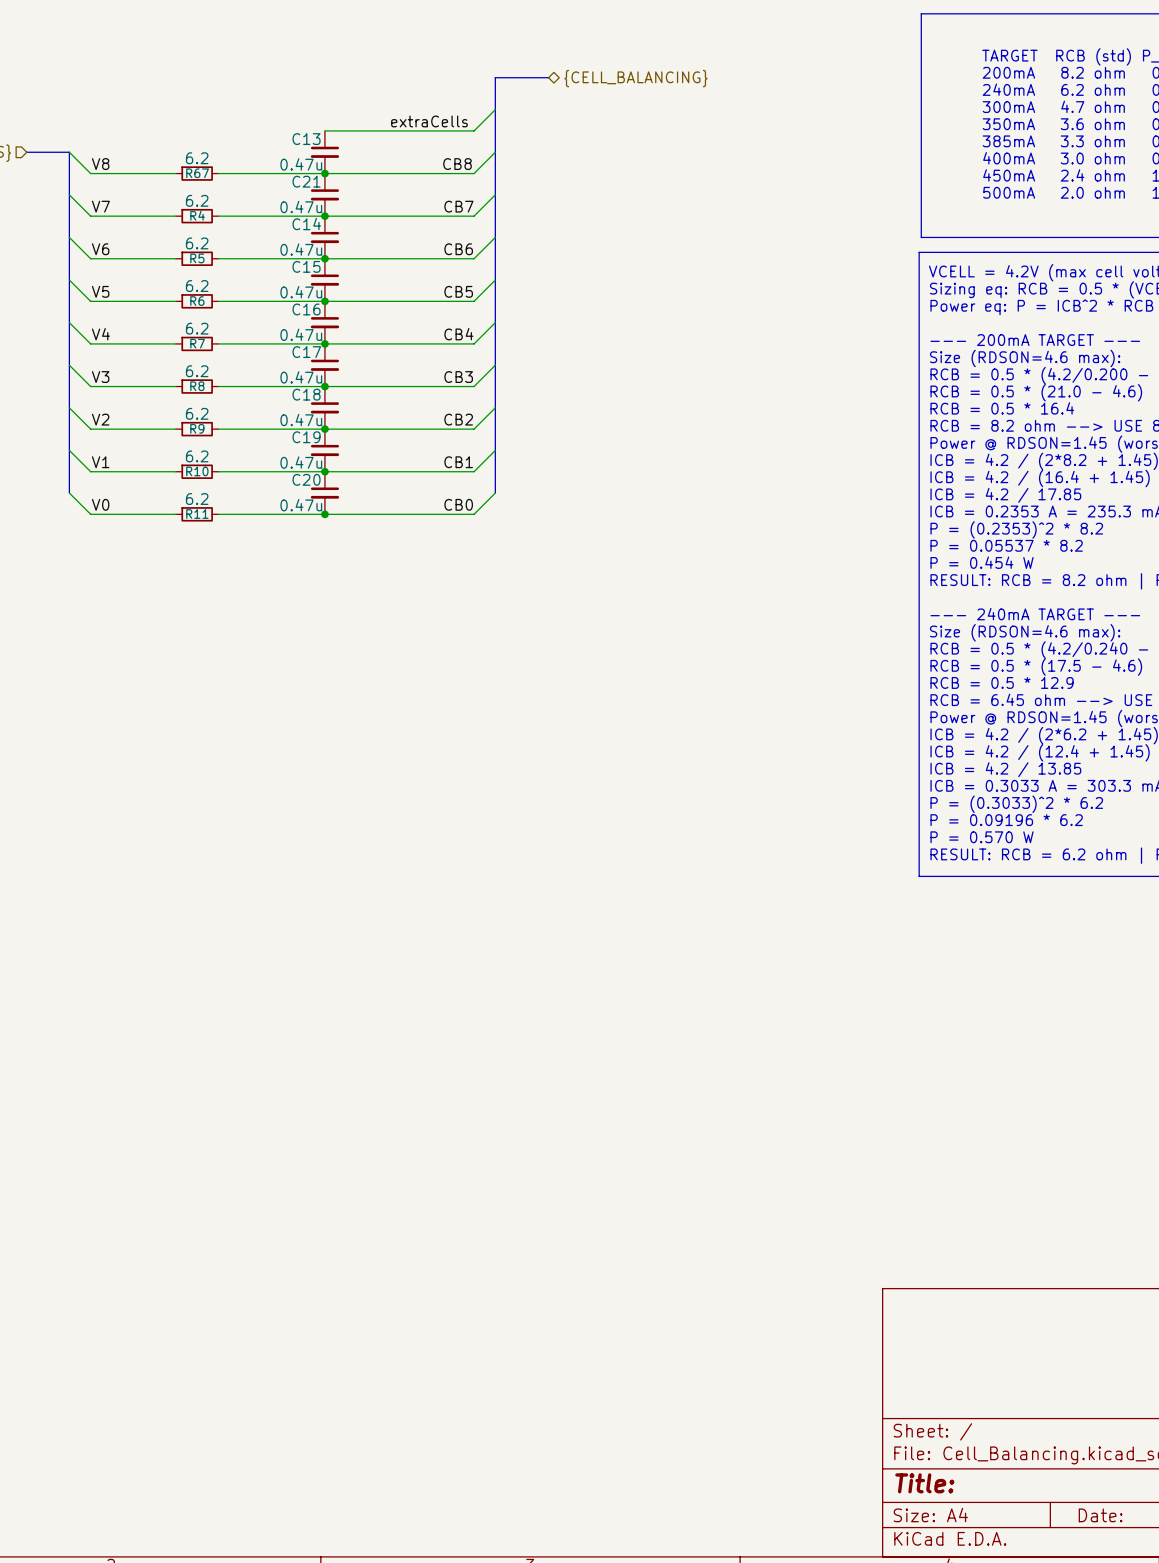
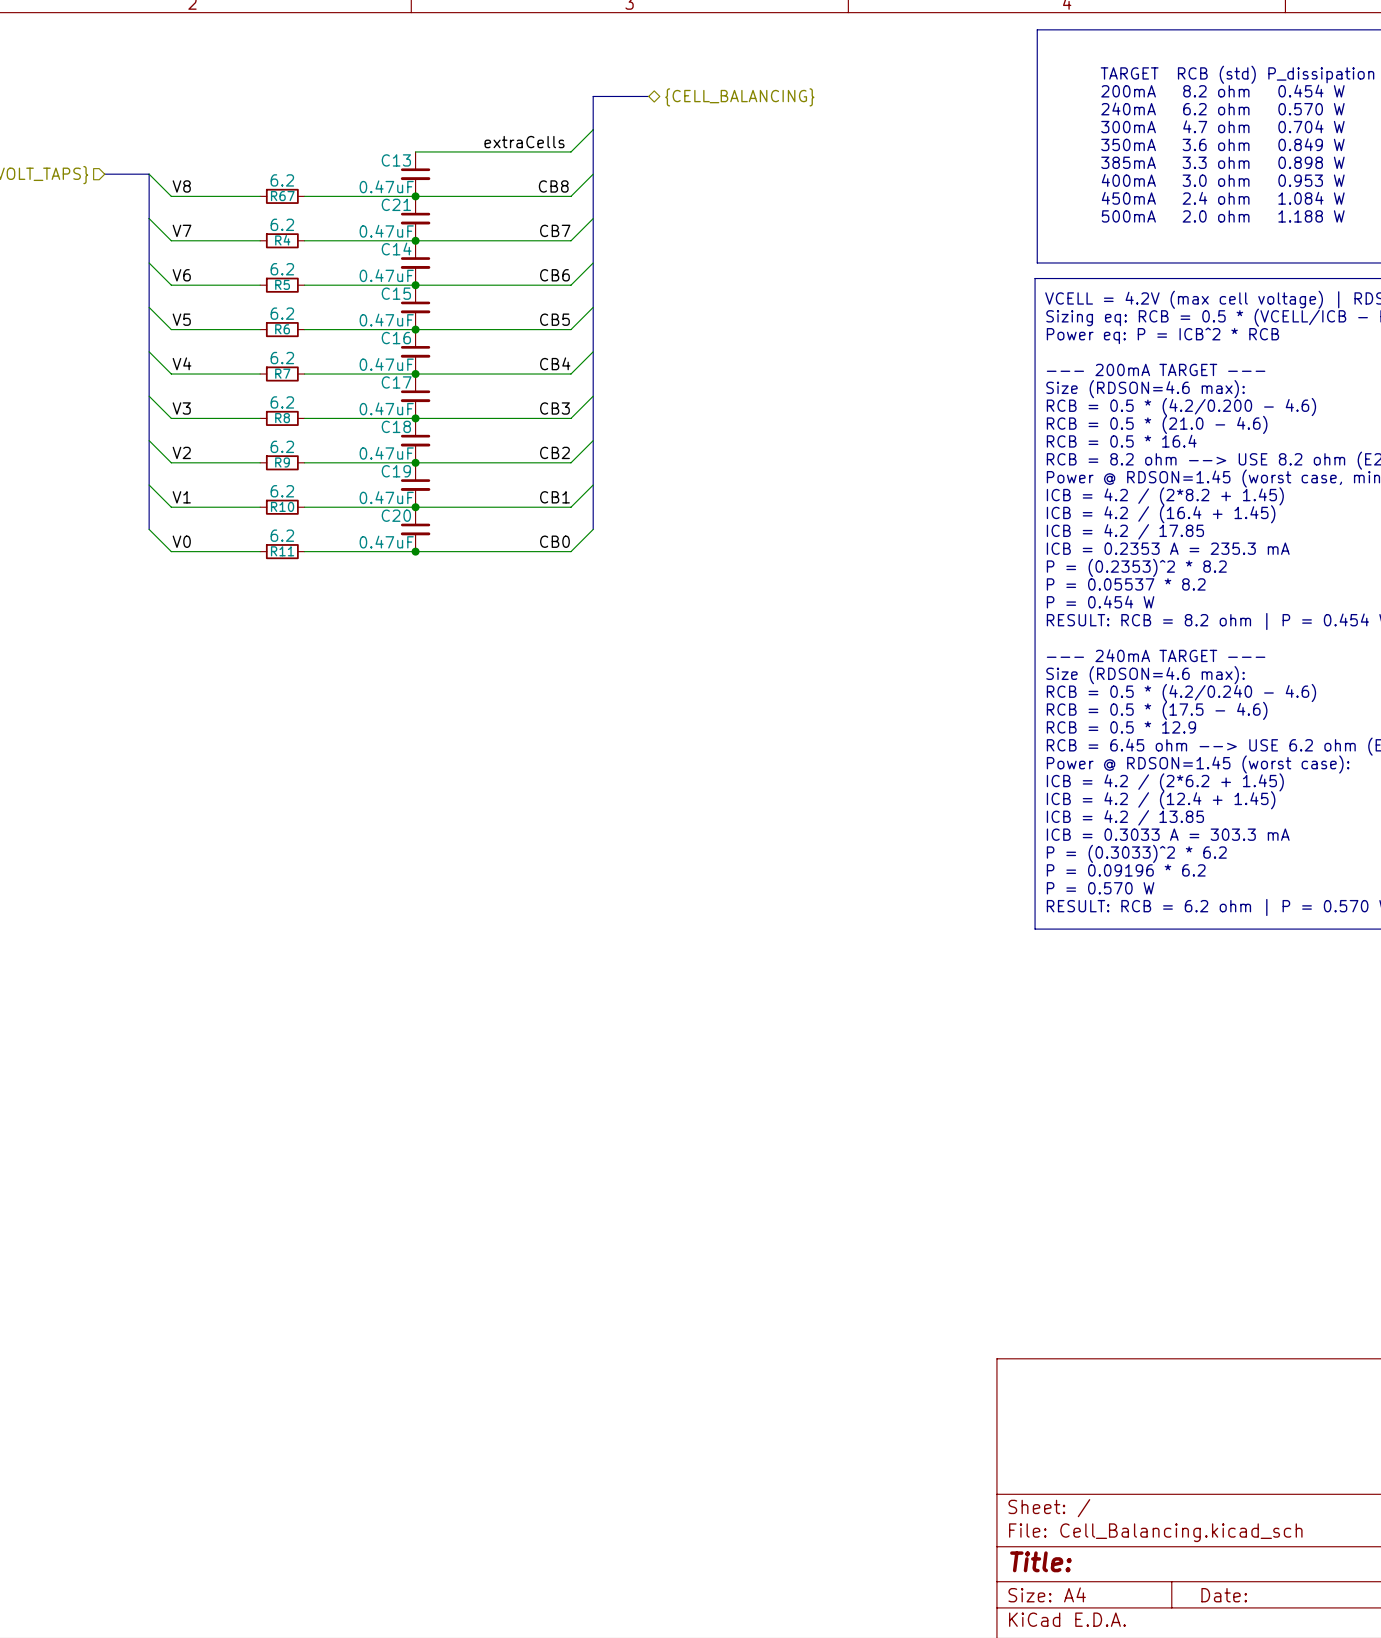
C13 value: 0.47u (301, 164) -> 0.47uF (386, 186)
C21 value: 0.47u (301, 206) -> 0.47uF (386, 231)
C14 value: 0.47u (301, 249) -> 0.47uF (386, 275)
C15 value: 0.47u (301, 292) -> 0.47uF (386, 320)
C16 value: 0.47u (301, 334) -> 0.47uF (386, 364)
C17 value: 0.47u (301, 377) -> 0.47uF (386, 408)
C18 value: 0.47u (301, 419) -> 0.47uF (386, 453)
C19 value: 0.47u (301, 462) -> 0.47uF (386, 497)
C20 value: 0.47u (301, 505) -> 0.47uF (386, 542)

